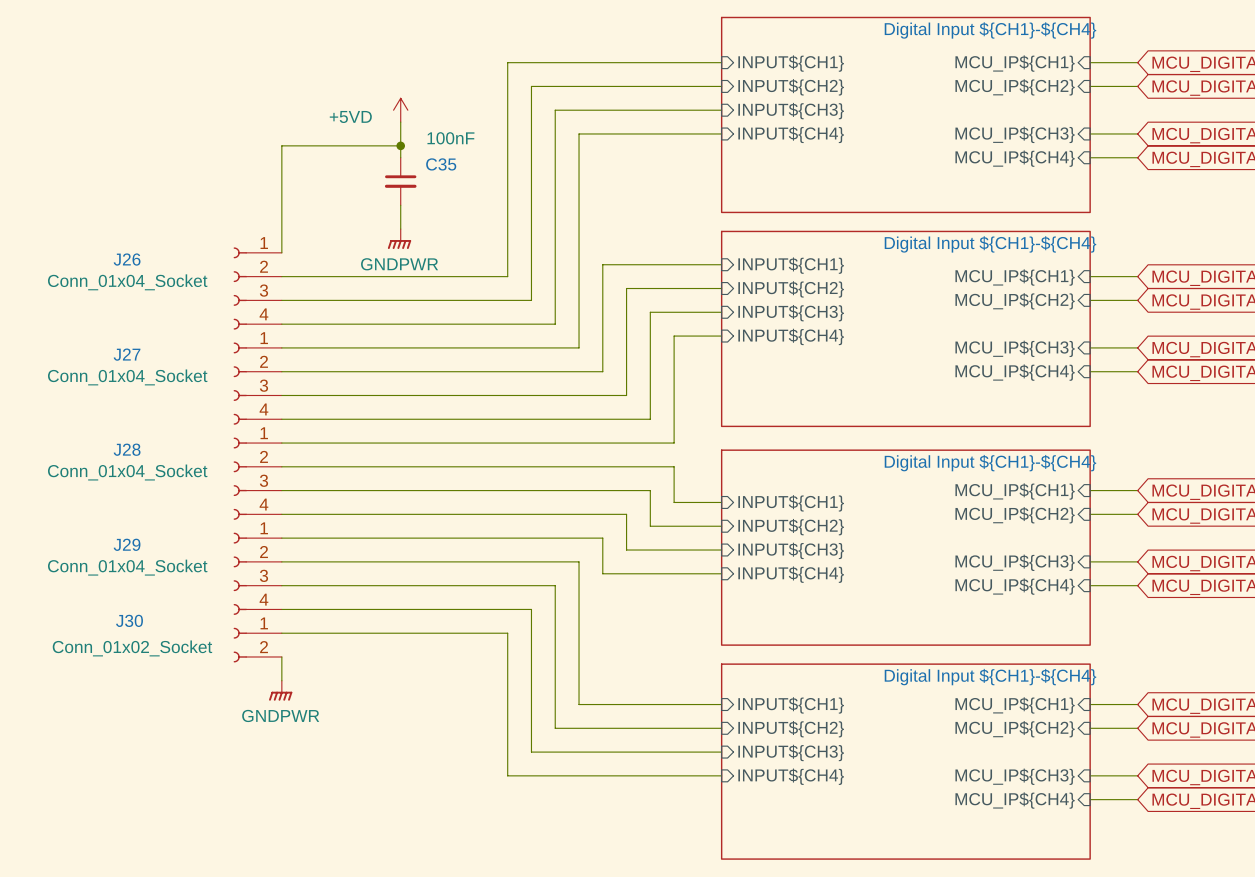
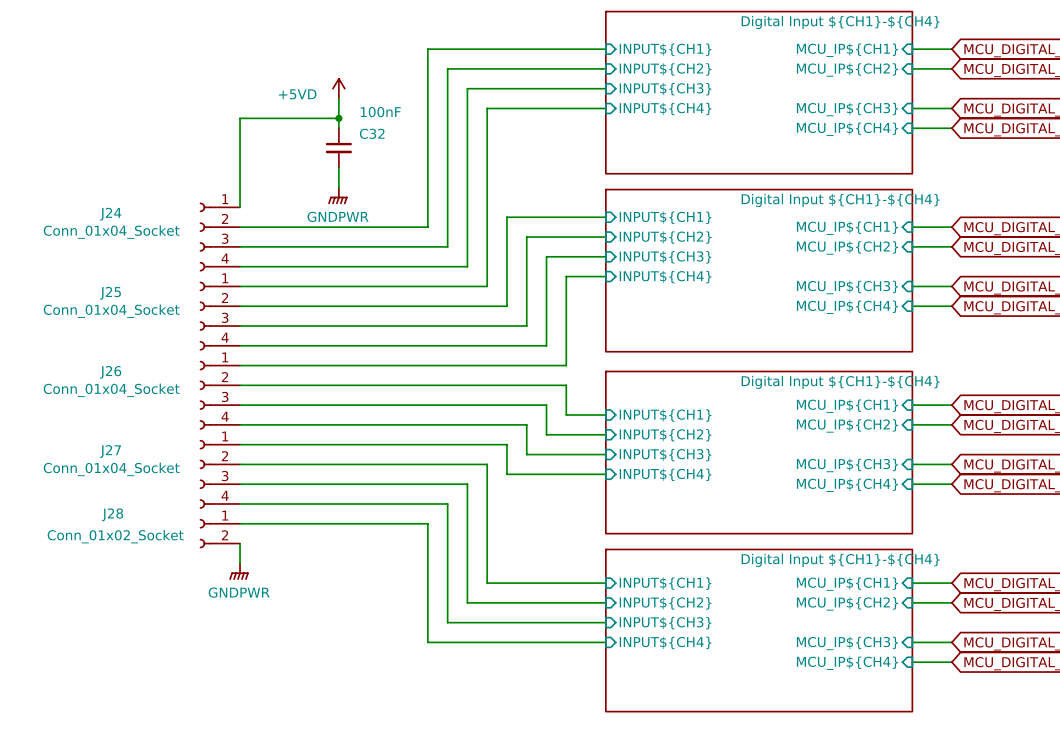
C35 name: C35 (441, 164) -> C32 (372, 133)
J26 name: J26 (127, 259) -> J24 (110, 214)
J27 name: J27 (127, 354) -> J25 (110, 293)
J28 name: J28 (127, 449) -> J26 (110, 372)
J29 name: J29 (127, 544) -> J27 (110, 451)
J30 name: J30 (129, 620) -> J28 (112, 514)

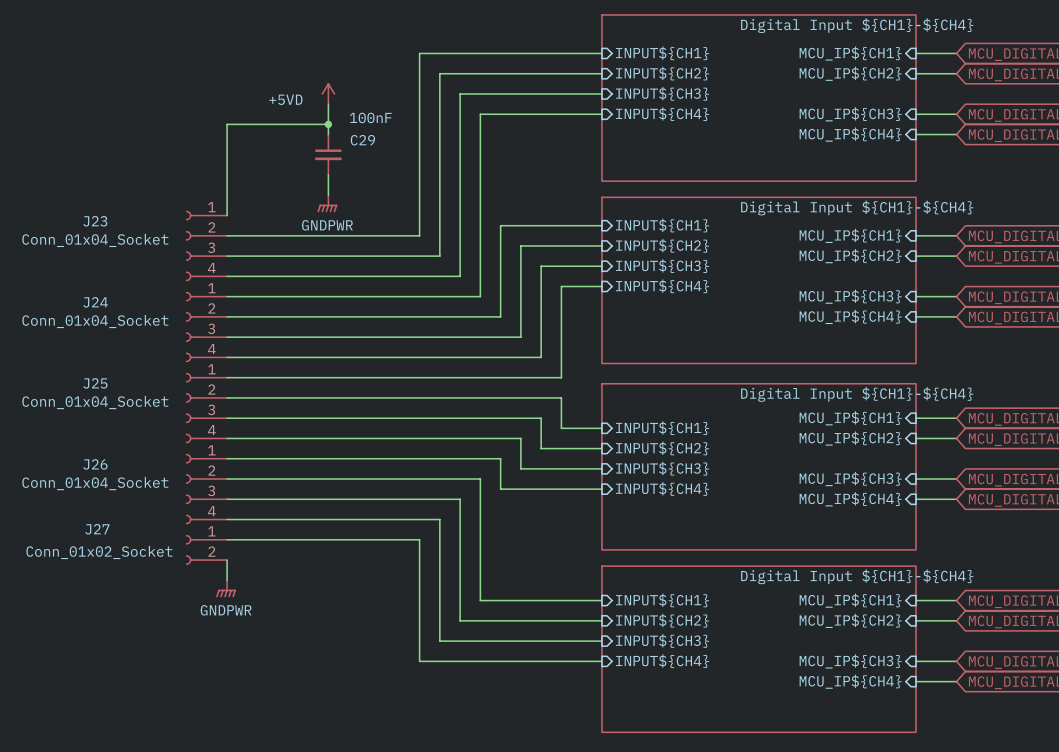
C32 name: C32 (372, 133) -> C29 (362, 140)
J24 name: J24 (110, 214) -> J23 (95, 221)
J25 name: J25 (110, 293) -> J24 (95, 302)
J26 name: J26 (110, 372) -> J25 (95, 383)
J27 name: J27 (110, 451) -> J26 (95, 464)
J28 name: J28 (112, 514) -> J27 (97, 529)

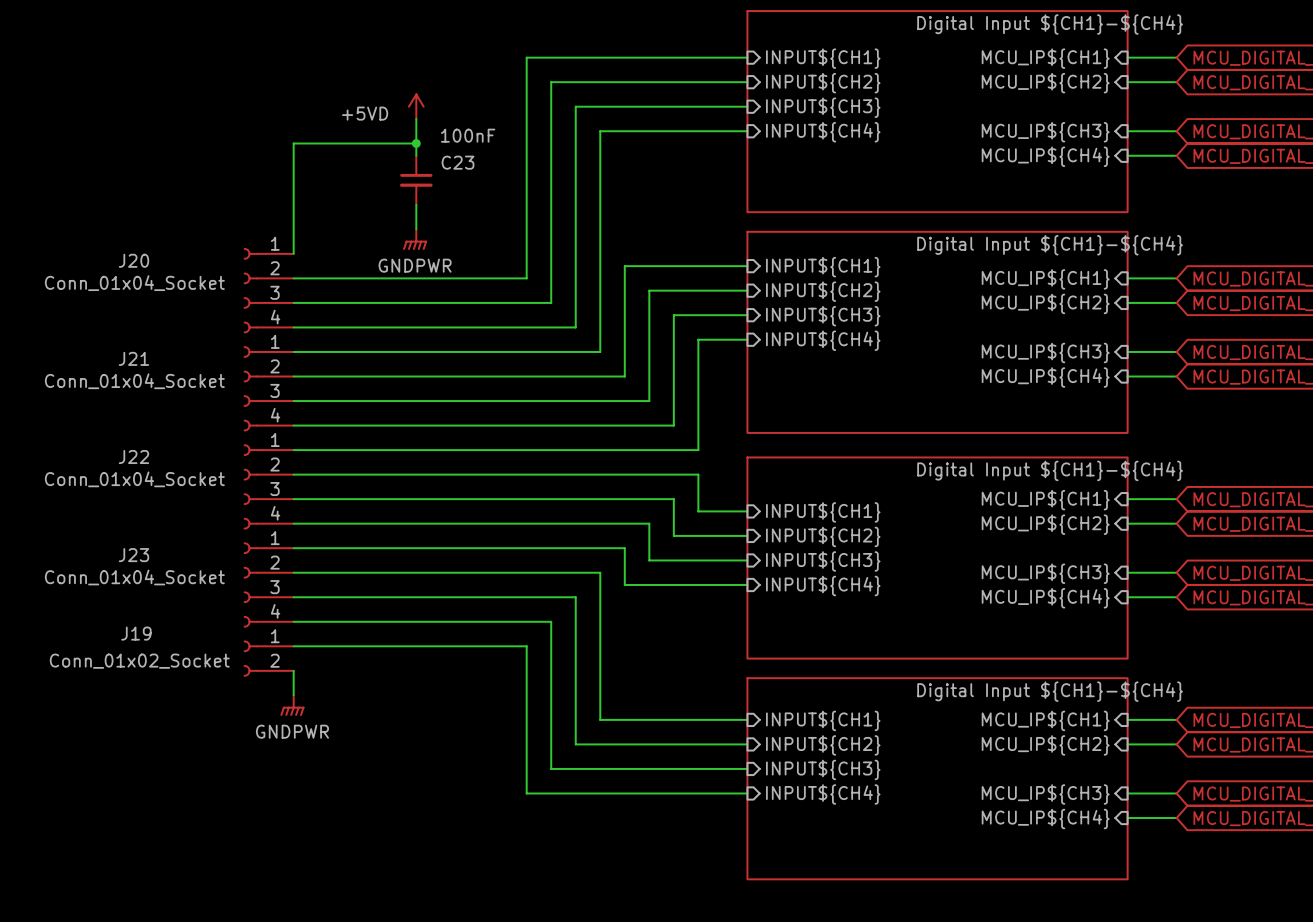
C29 name: C29 (362, 140) -> C23 (458, 162)
J23 name: J23 (95, 221) -> J20 (133, 260)
J24 name: J24 (95, 302) -> J21 (133, 358)
J25 name: J25 (95, 383) -> J22 (133, 456)
J26 name: J26 (95, 464) -> J23 (133, 555)
J27 name: J27 (97, 529) -> J19 (136, 633)

